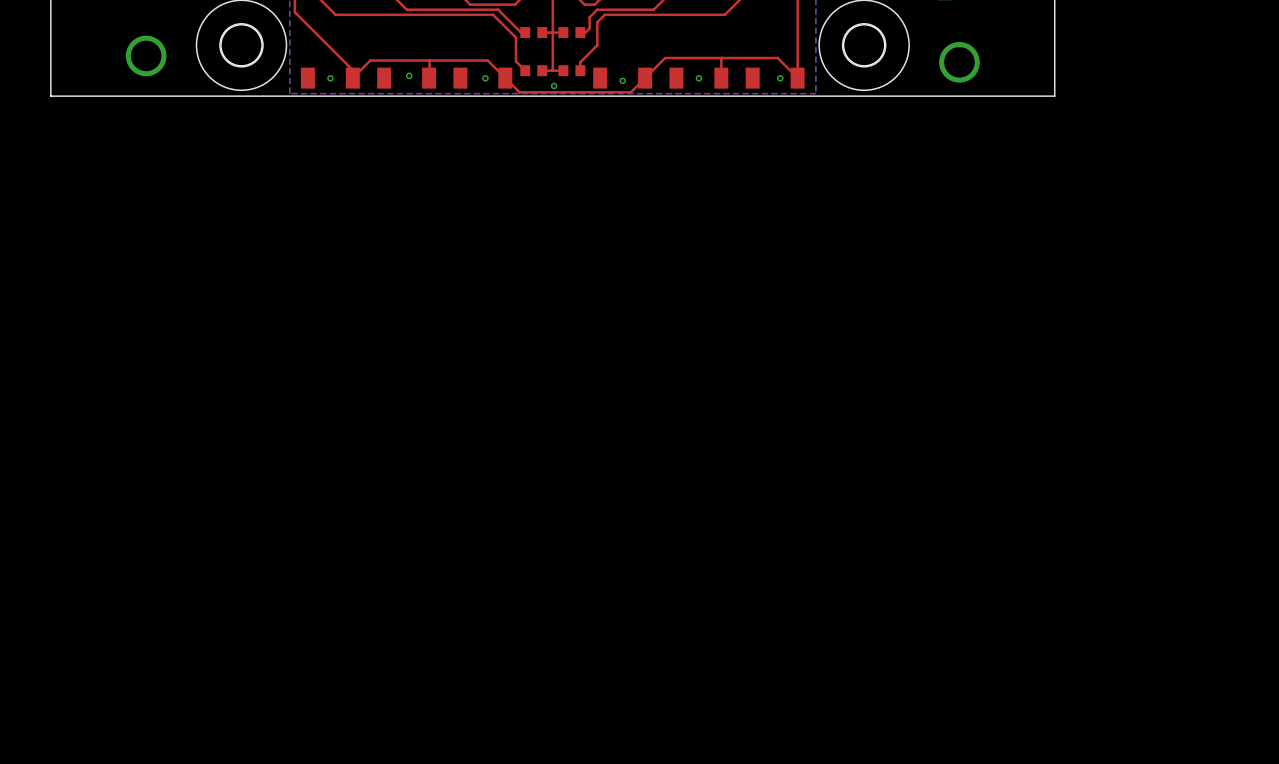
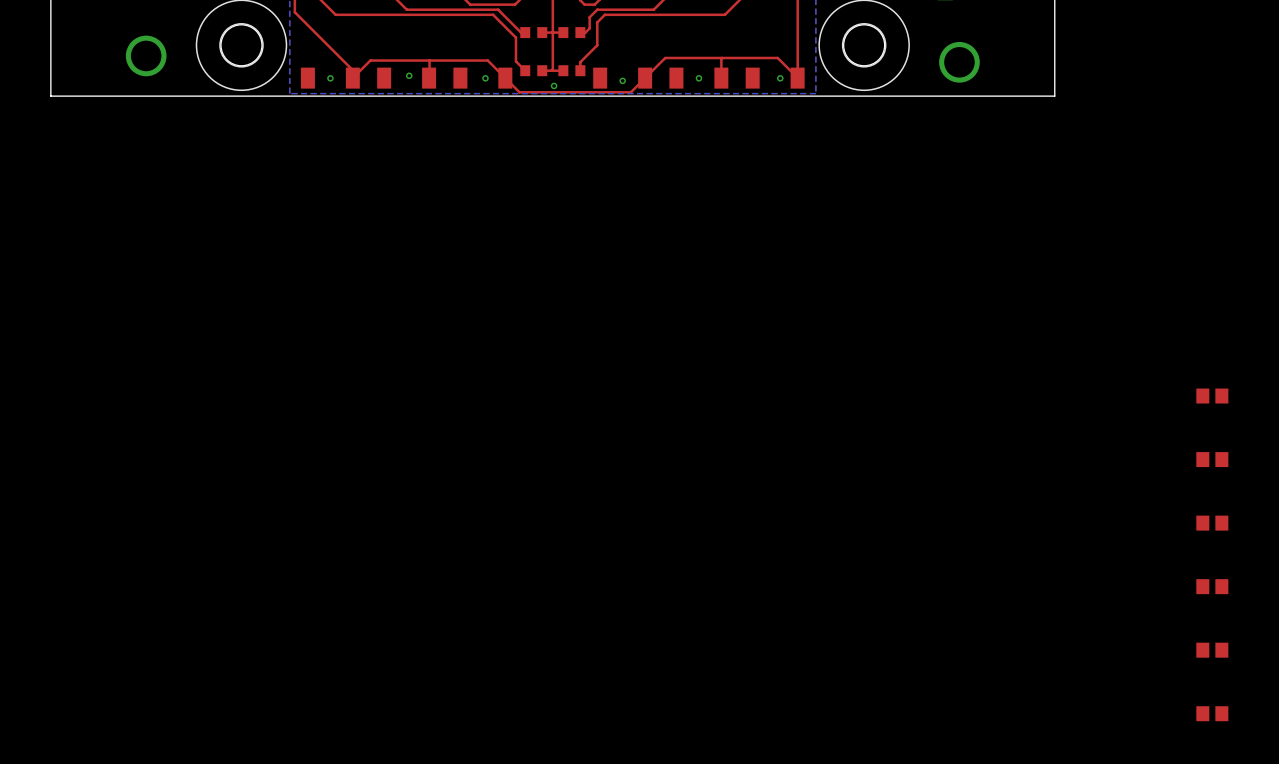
part: none -> (1212, 396)
part: none -> (1212, 459)
part: none -> (1212, 523)
part: none -> (1212, 586)
part: none -> (1212, 650)
part: none -> (1212, 713)

